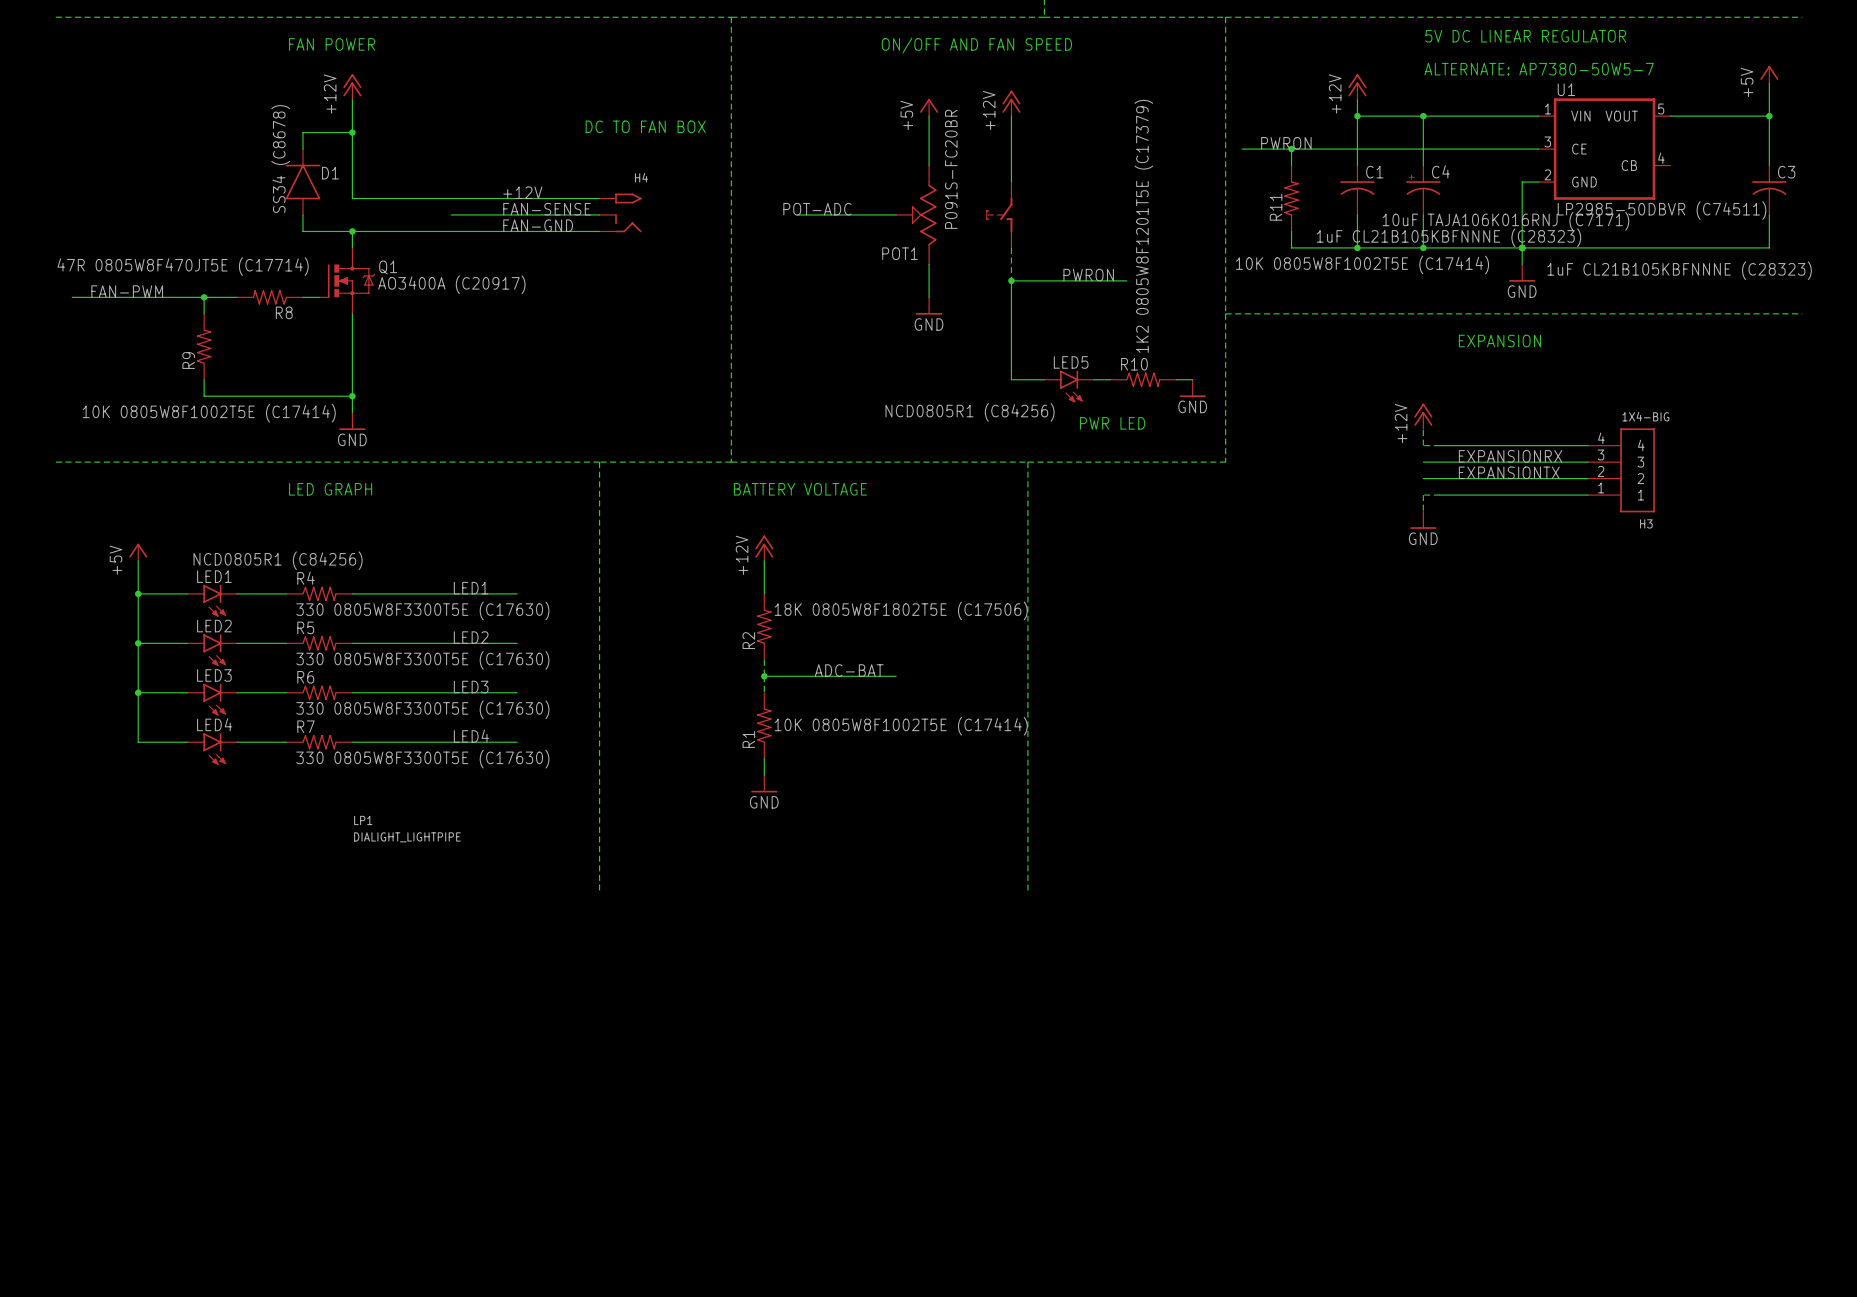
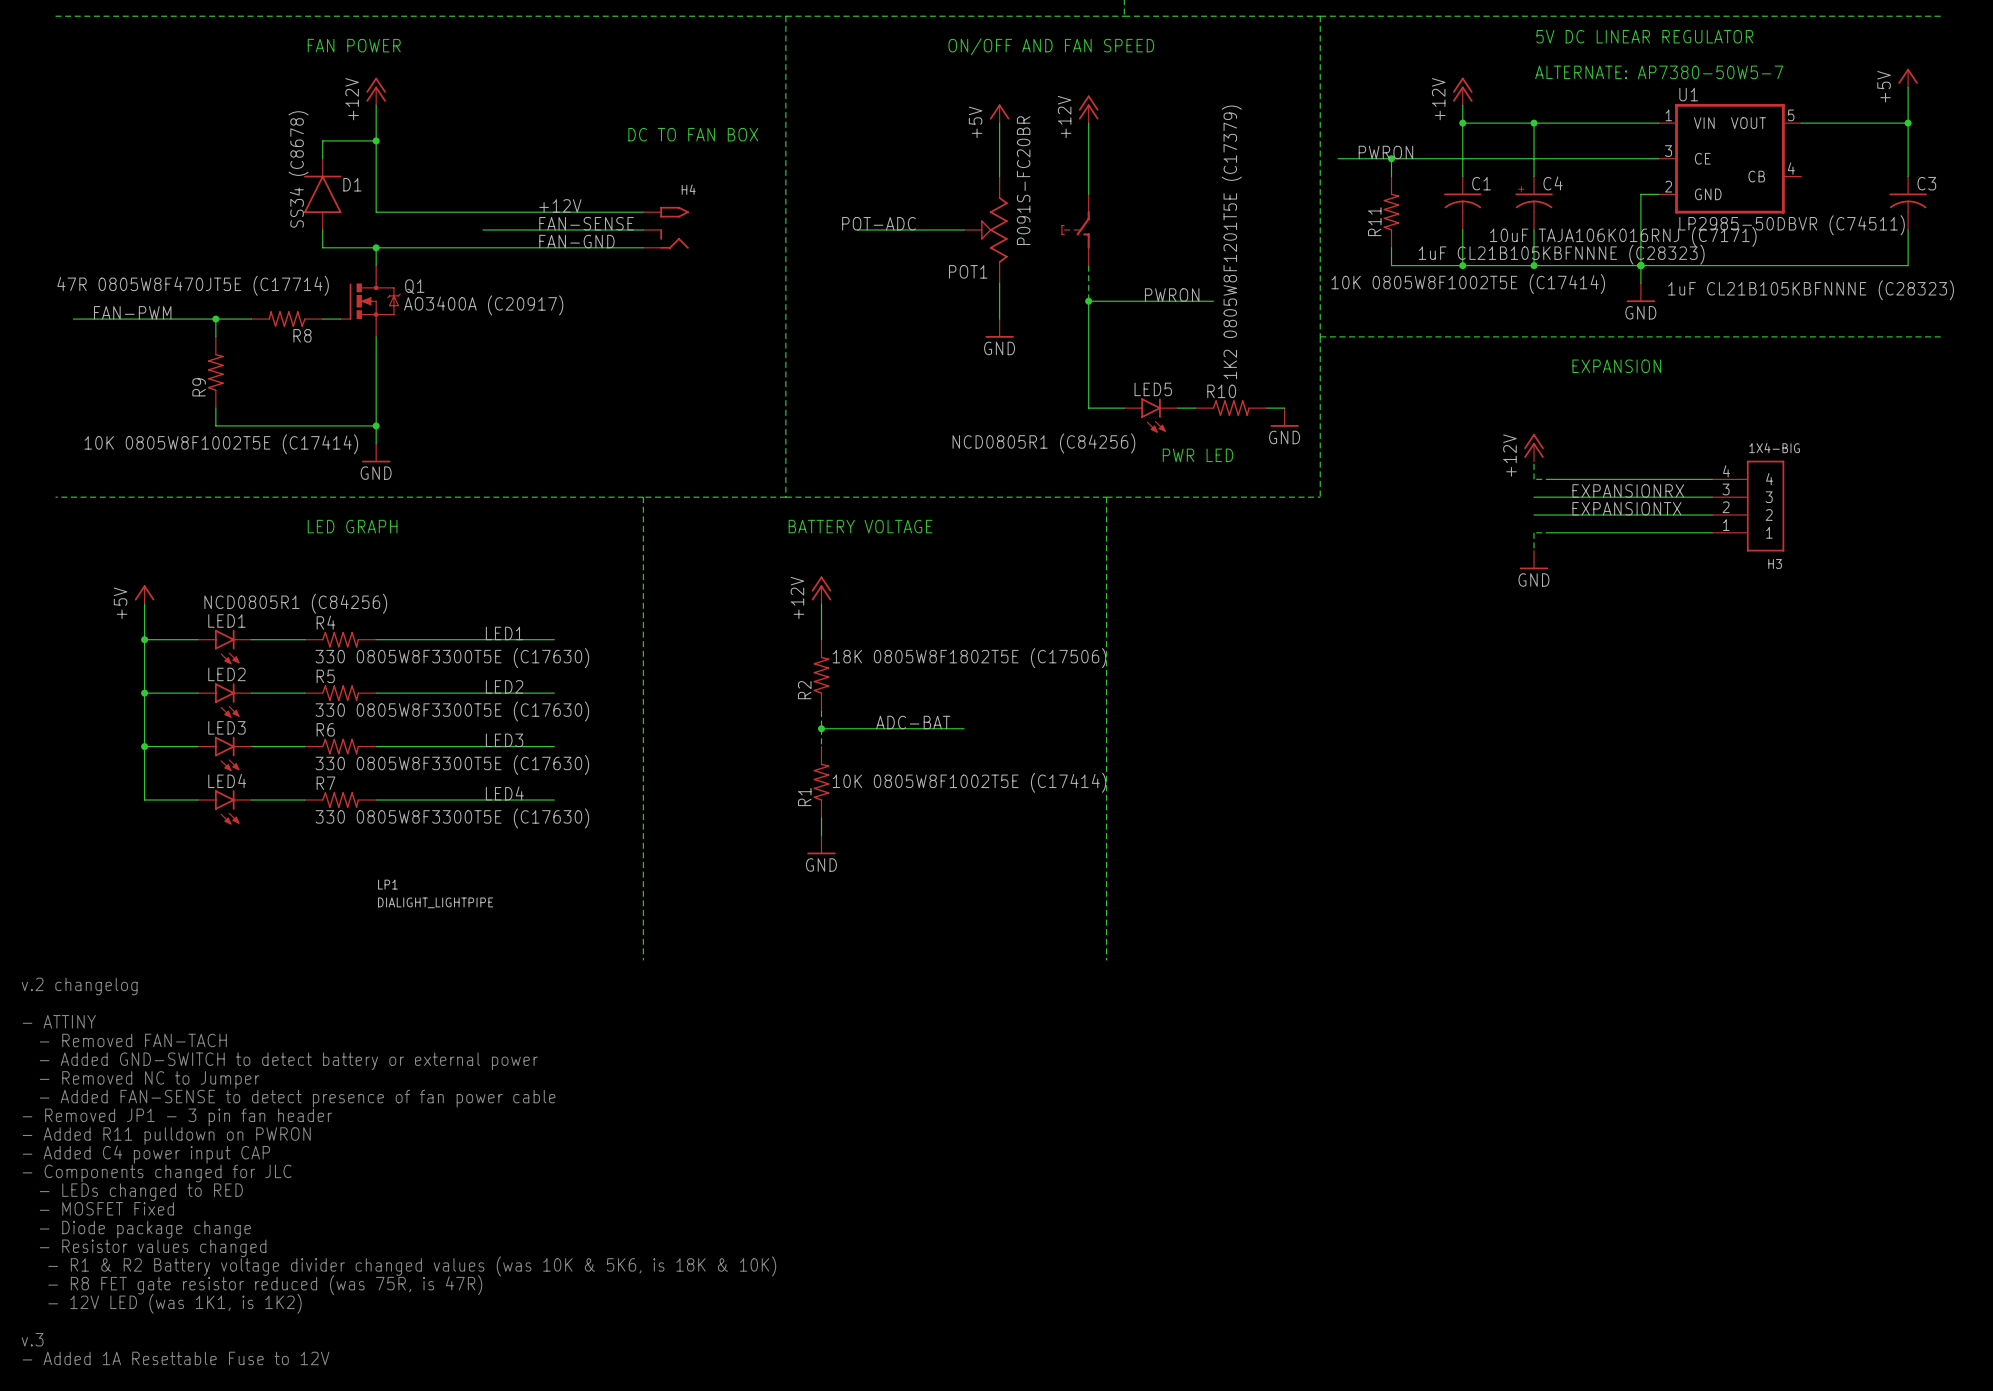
text: none -> v.2 changelog (79, 986)
text: none -> - ATTINY (59, 1021)
text: none -> - Removed FAN-TACH (133, 1040)
text: none -> - Added GND-SWITCH to detect battery or external power (288, 1061)
text: none -> - Removed NC to Jumper (149, 1079)
text: none -> - Added FAN-SENSE to detect presence of fan power cable (297, 1098)
text: none -> - Removed JP1 - 3 pin fan header (177, 1117)
text: none -> - Added R11 pulldown on PWRON (166, 1136)
text: none -> - Added C4 power input CAP (146, 1154)
text: none -> - Components changed for JLC (157, 1173)
text: none -> - LEDs changed to RED (141, 1192)
text: none -> - MOSFET Fixed (106, 1208)
text: none -> - Diode package change (145, 1229)
text: none -> - Resistor values changed (153, 1248)
text: none -> - R1 & R2 Battery voltage divider changed values (was 10K & 5K6, is 18K & 10K) (412, 1266)
text: none -> - R8 FET gate resistor reduced (was 75R, is 47R) (265, 1285)
text: none -> - 12V LED (was 1K1, is 1K2) (175, 1303)
text: none -> v.3 (32, 1339)
text: none -> - Added 1A Resettable Fuse to 12V (176, 1358)

